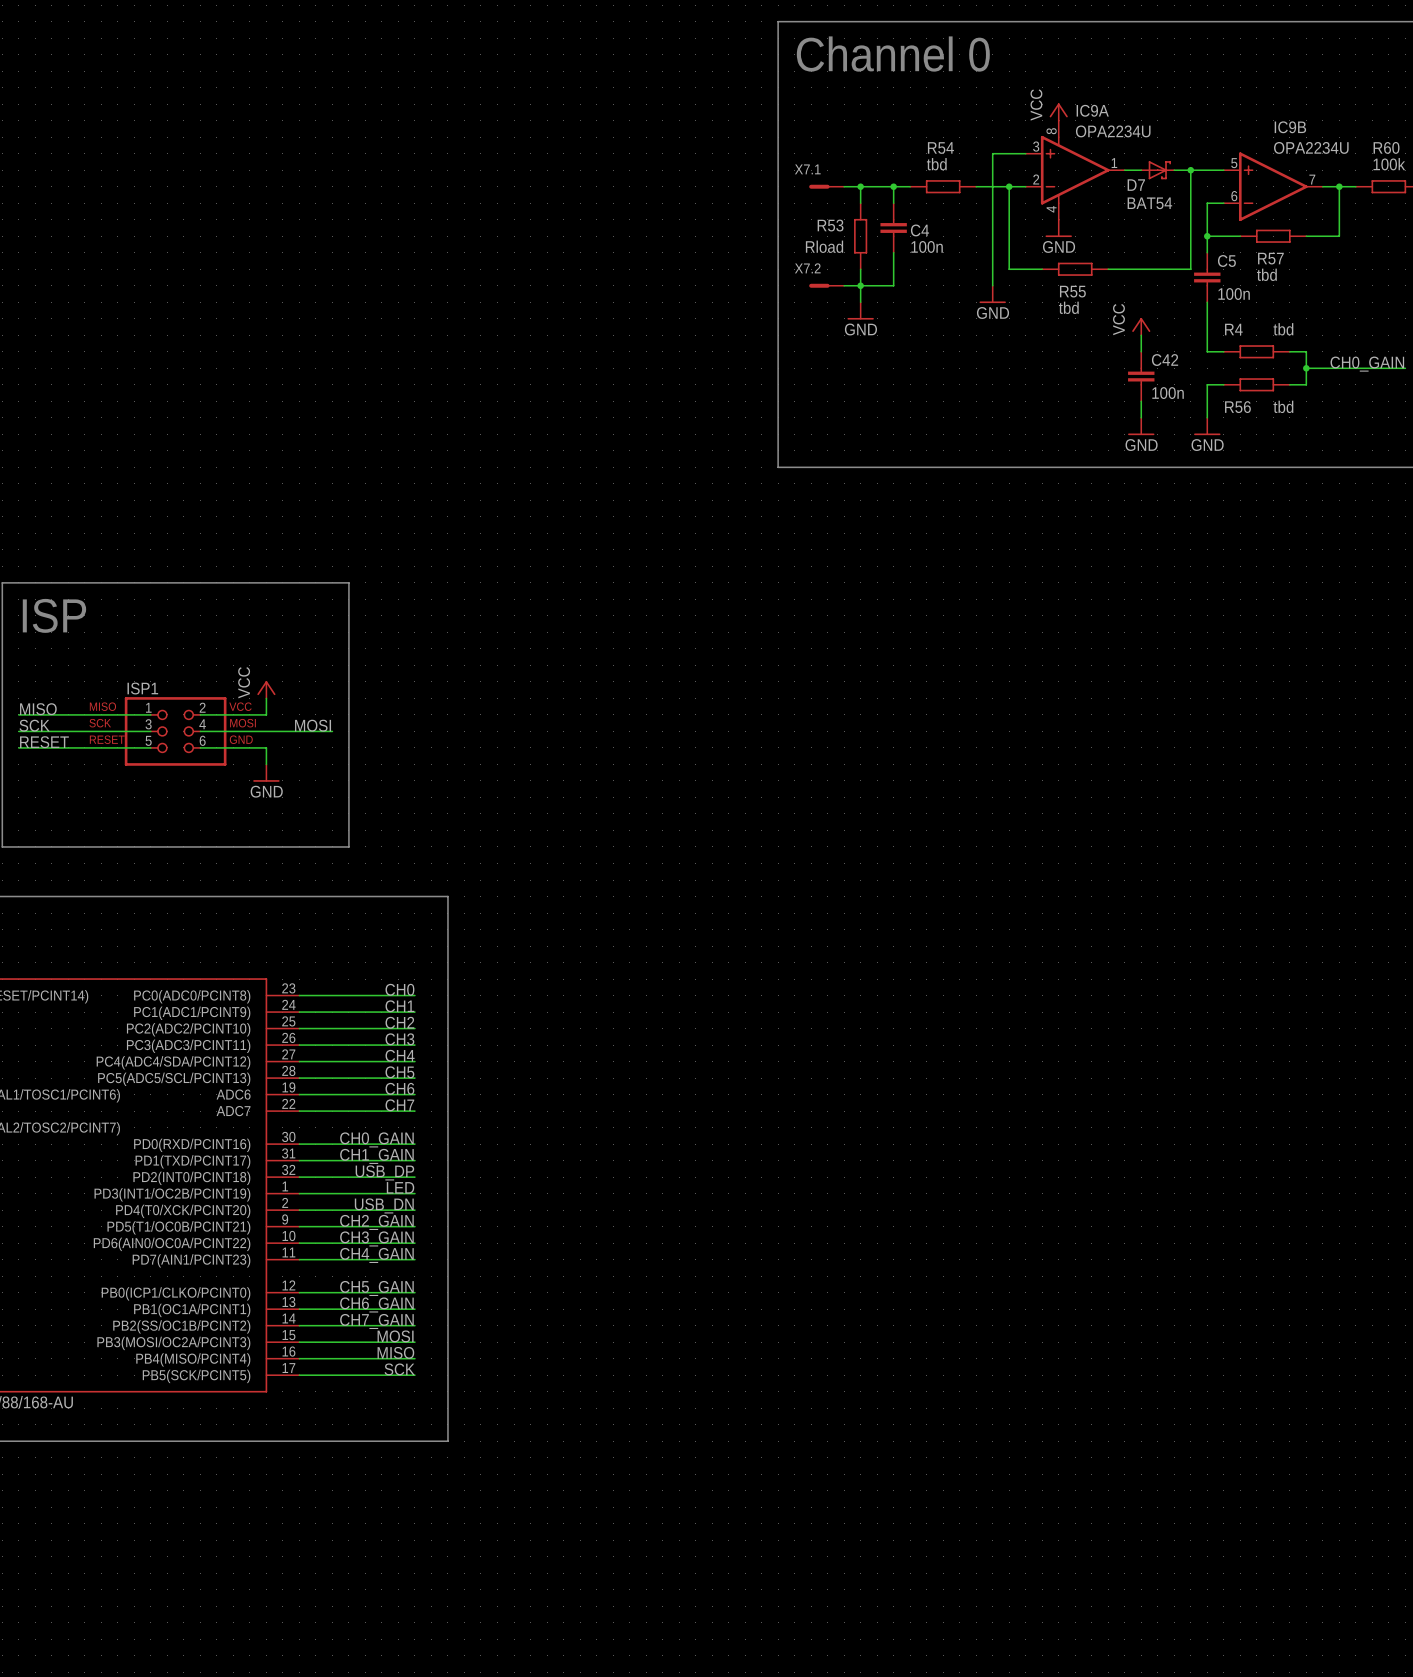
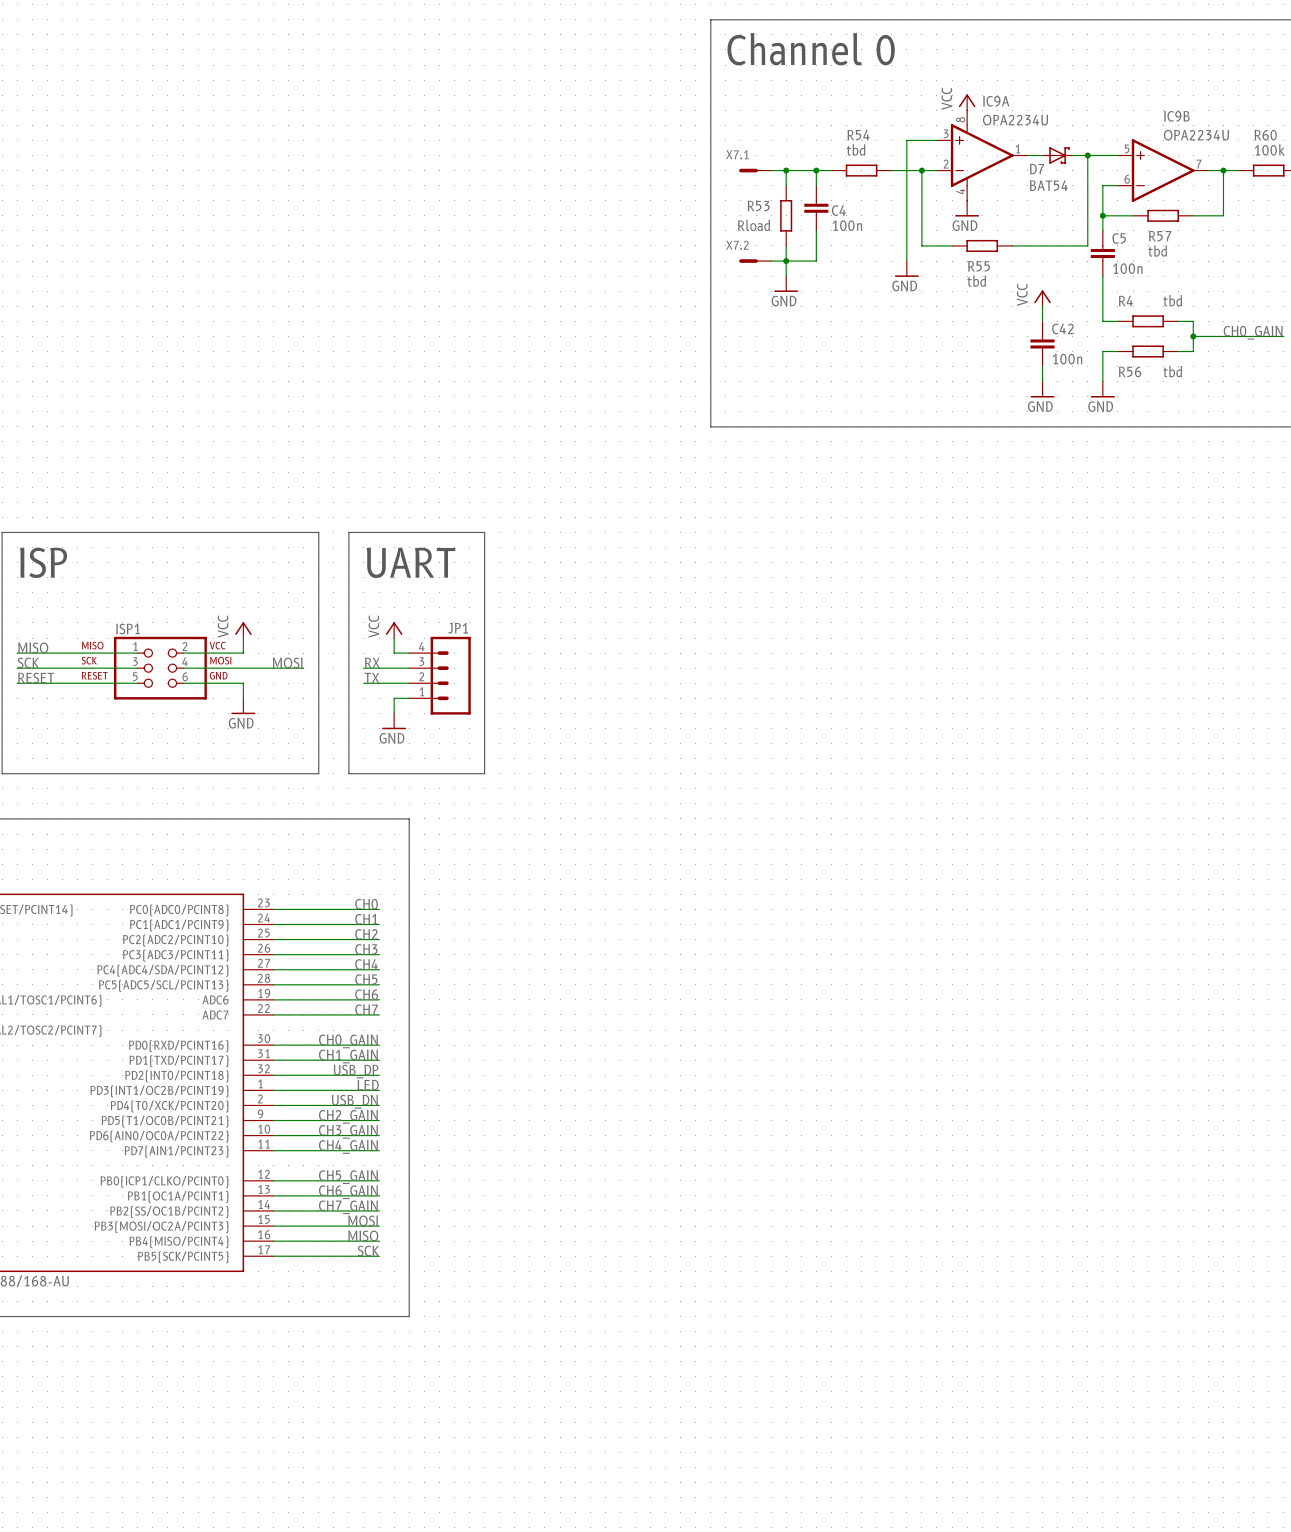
line: none -> (348, 532) (484, 532) (484, 773) (348, 773) (348, 532)
text: none -> UART (411, 562)
power symbol: none -> VCC (394, 630)
wire: none -> (394, 638) (394, 653) (409, 653)
label: none -> RX (372, 662)
wire: none -> (363, 668) (409, 668)
JP1: none -> (439, 675)
label: none -> TX (371, 677)
wire: none -> (363, 683) (409, 683)
wire: none -> (409, 698) (394, 698) (394, 713)
power symbol: none -> GND (394, 721)

